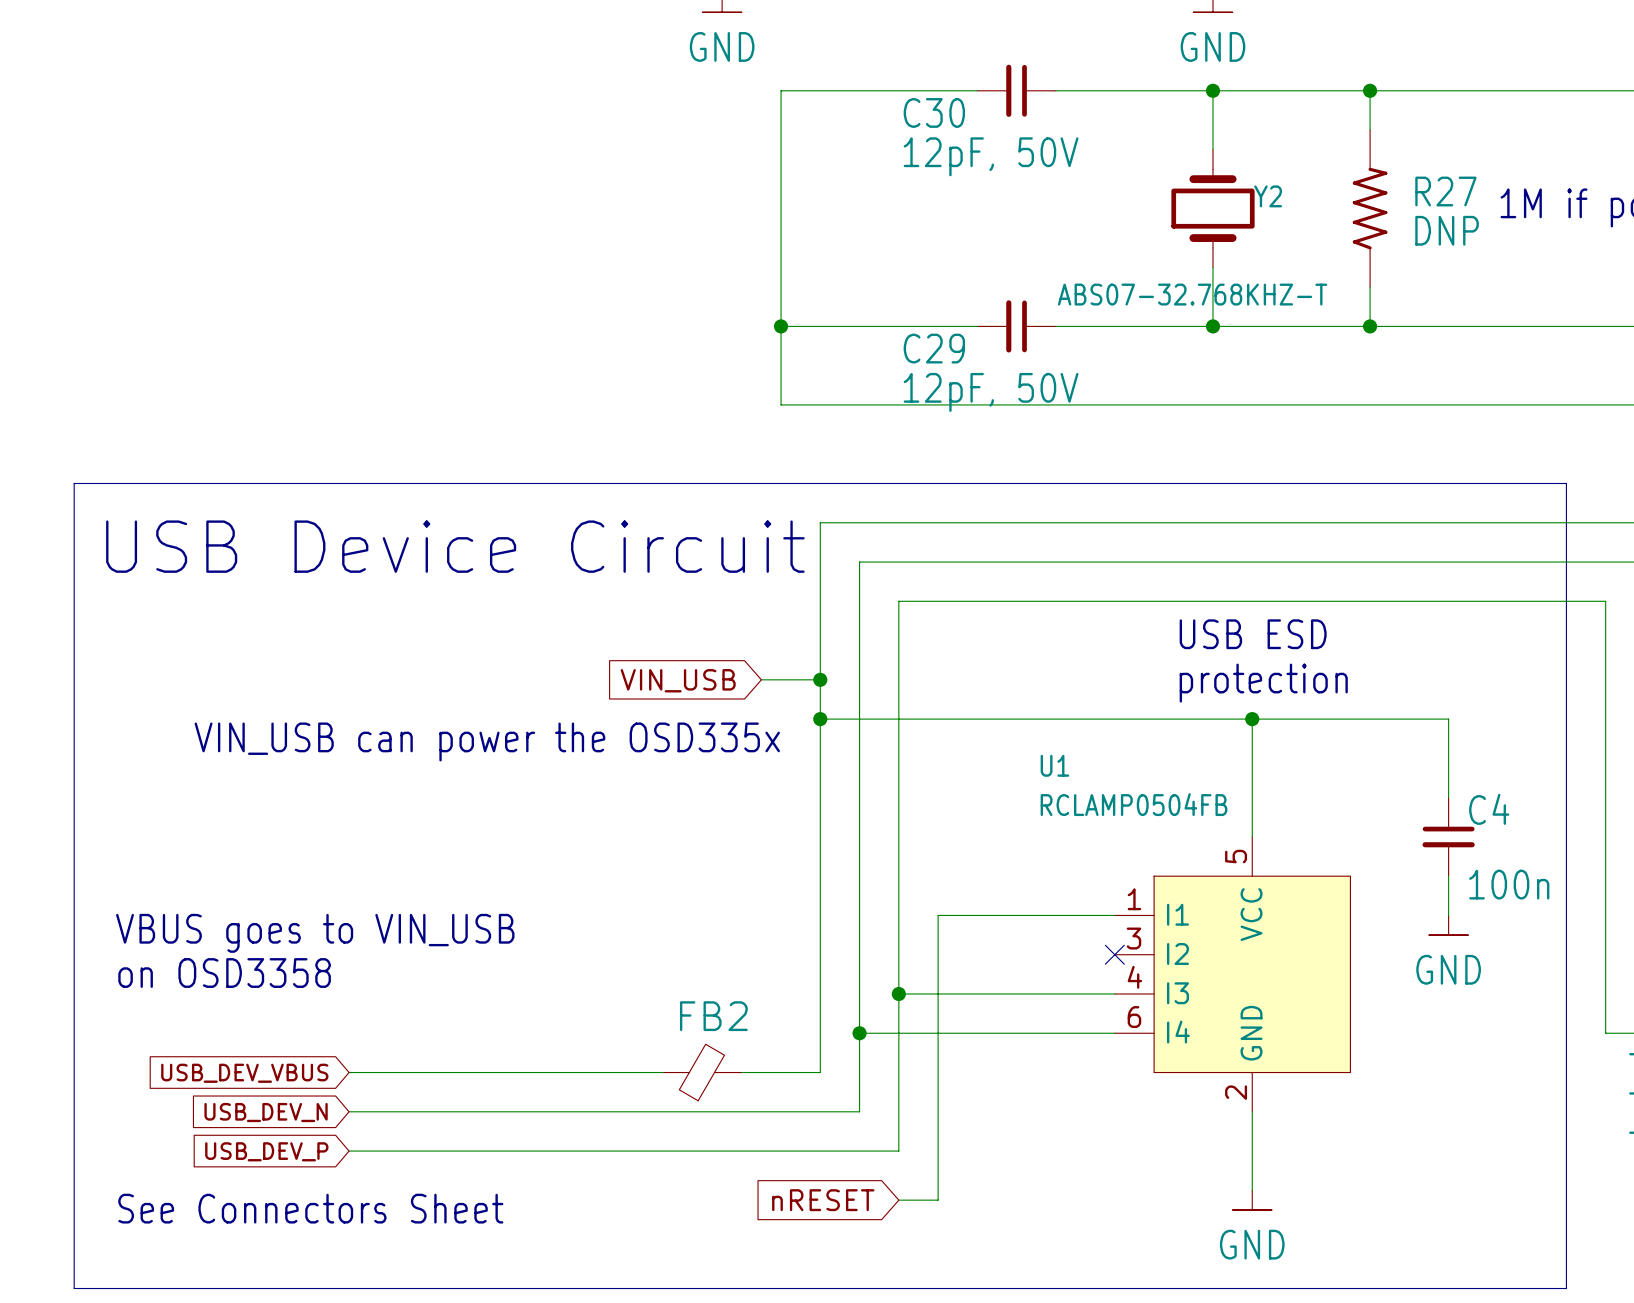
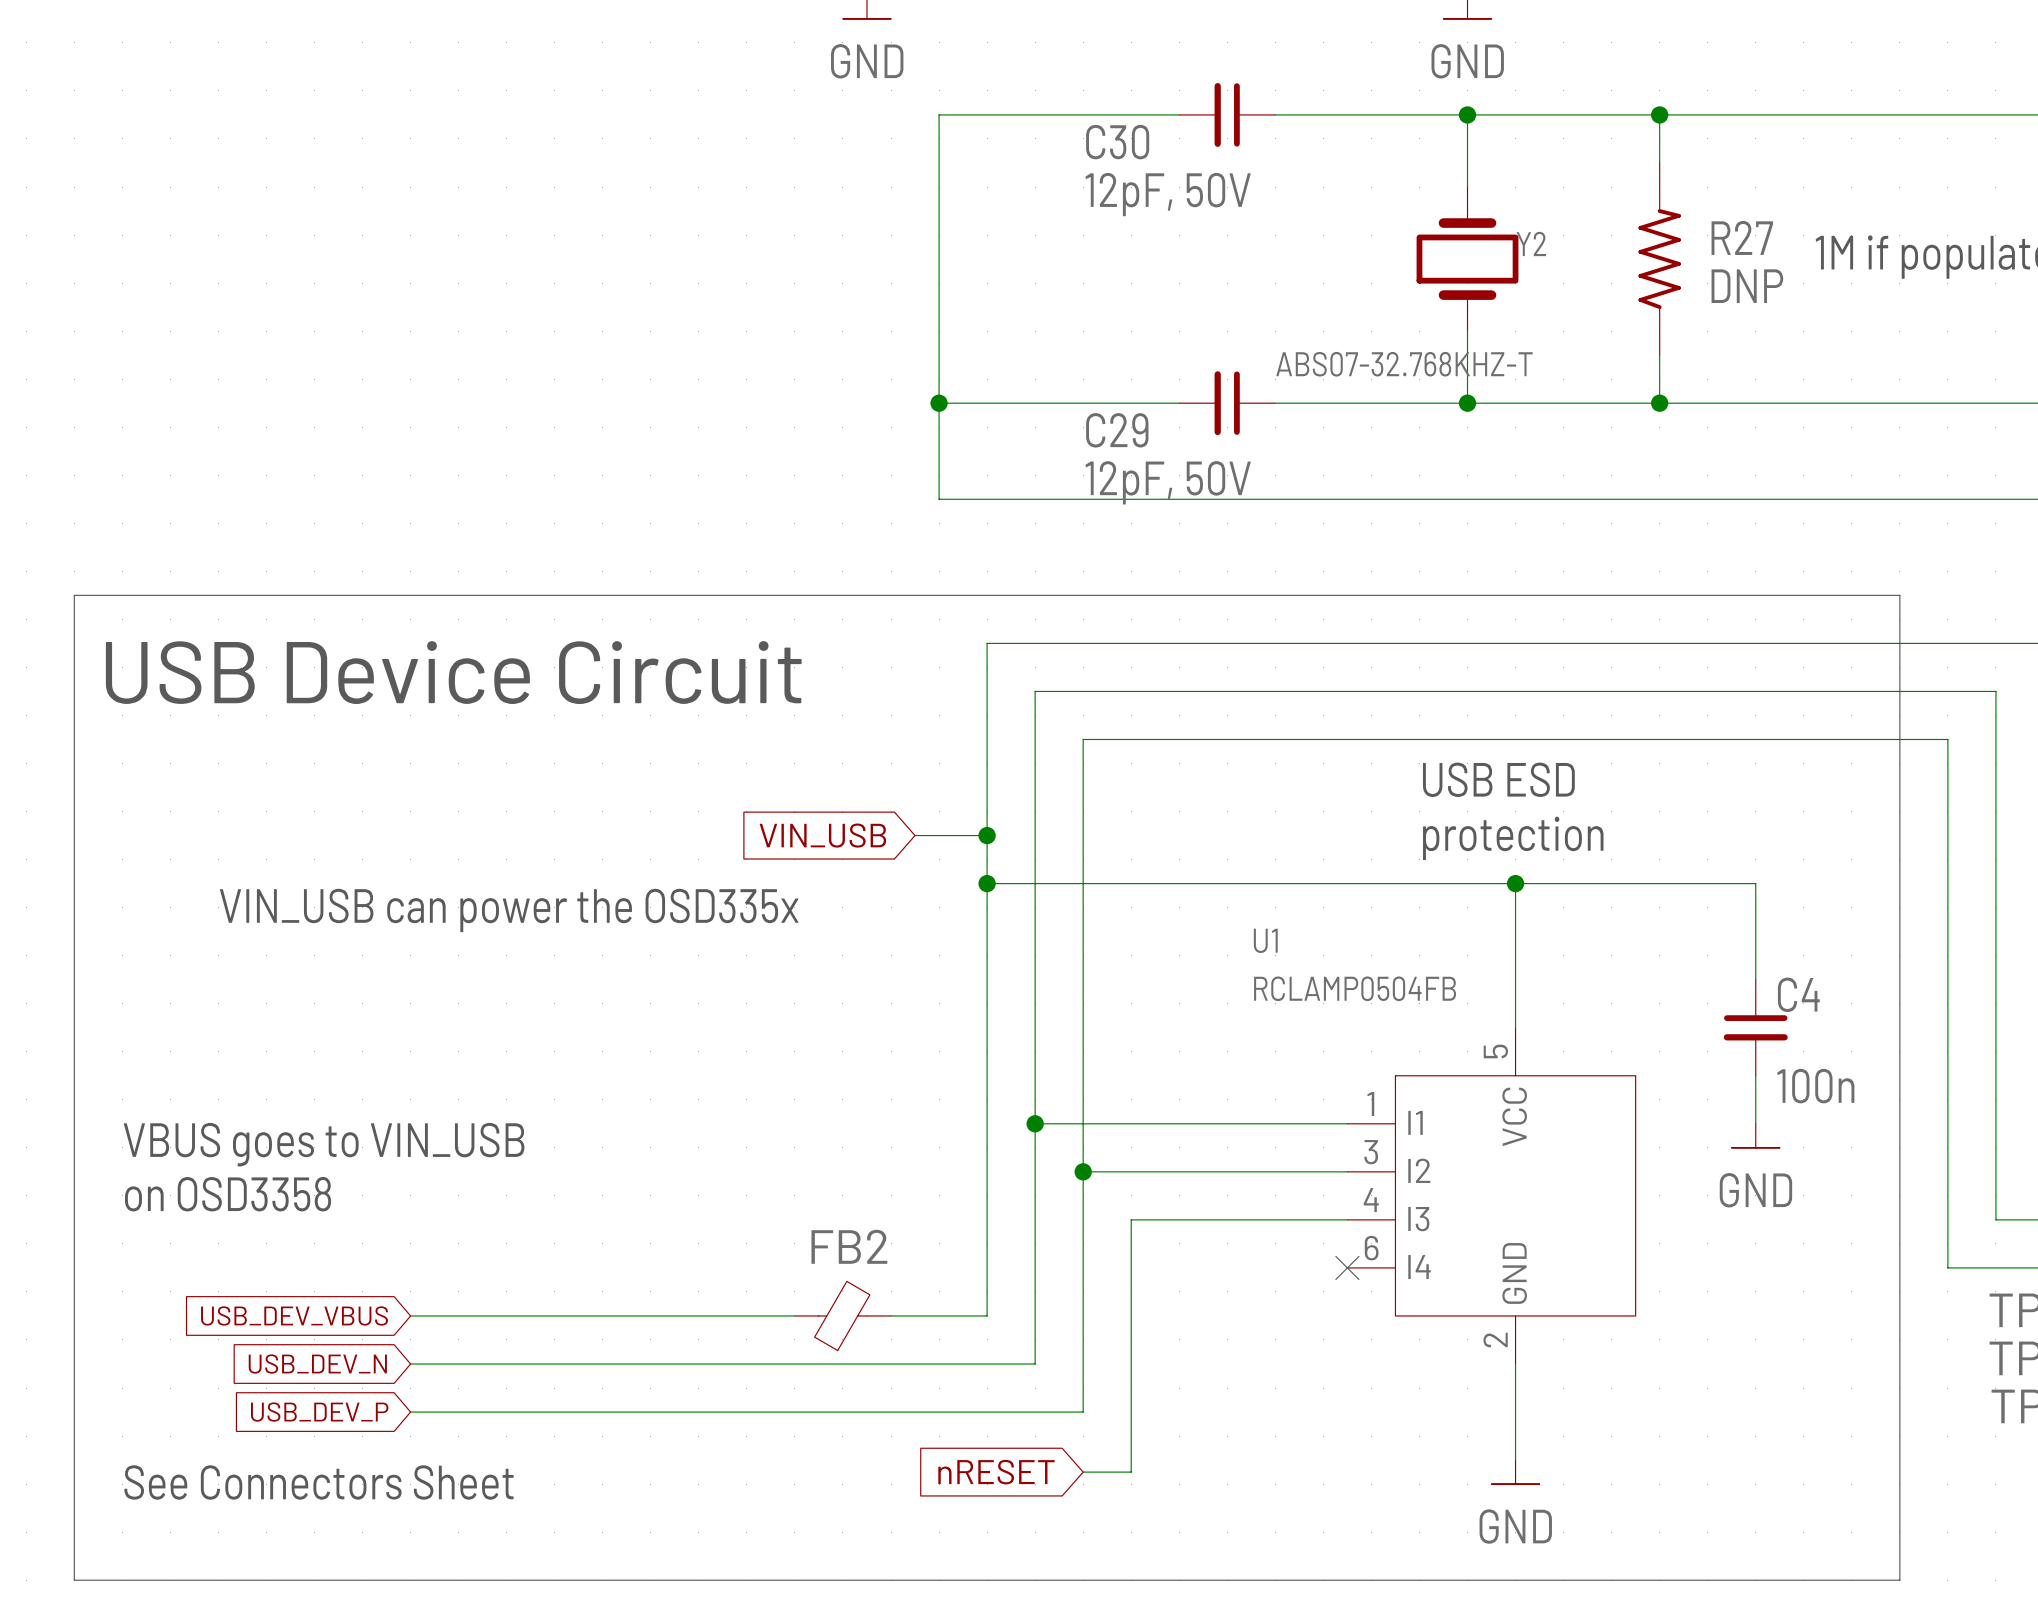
junction: none -> (1035, 1123)
wire: (938, 915) (938, 993) (898, 993) -> (1131, 1123) (1035, 1123)
wire: none -> (1083, 1171) (1347, 1171)
no-connect mark position: (1114, 954) -> (1347, 1267)
junction position: (898, 993) -> (1083, 1171)
wire: (859, 1033) (1114, 1033) -> none
junction: (859, 1033) -> none

